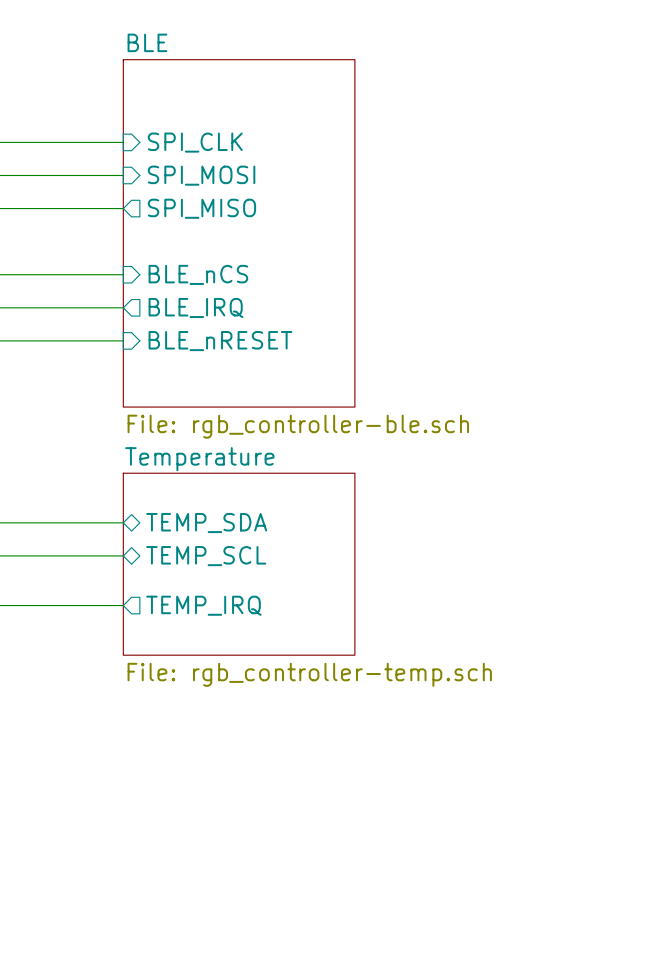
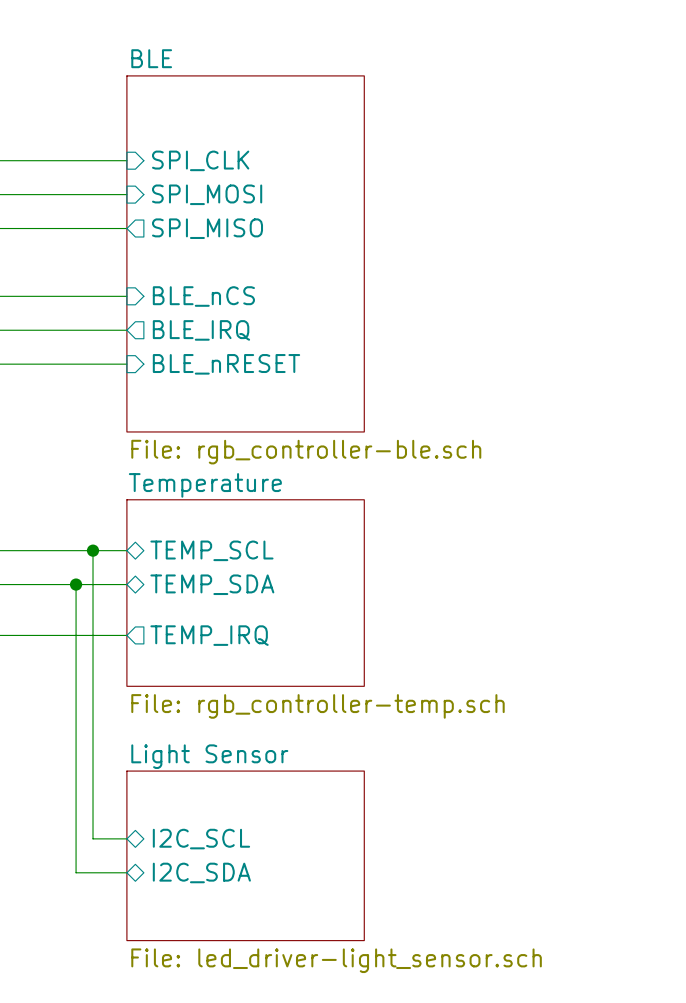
wire: none -> (93, 550) (93, 838) (126, 838)
junction: none -> (93, 550)
sheet pin: TEMP_SDA (206, 523) -> TEMP_SCL (211, 550)
wire: none -> (76, 584) (76, 872) (126, 872)
junction: none -> (76, 584)
sheet pin: TEMP_SCL (206, 556) -> TEMP_SDA (212, 584)
sheet pin: none -> I2C_SCL (201, 839)
sheet Light Sensor: none -> File: led_driver-light_sensor.sch (245, 855)
sheet pin: none -> I2C_SDA (201, 872)

